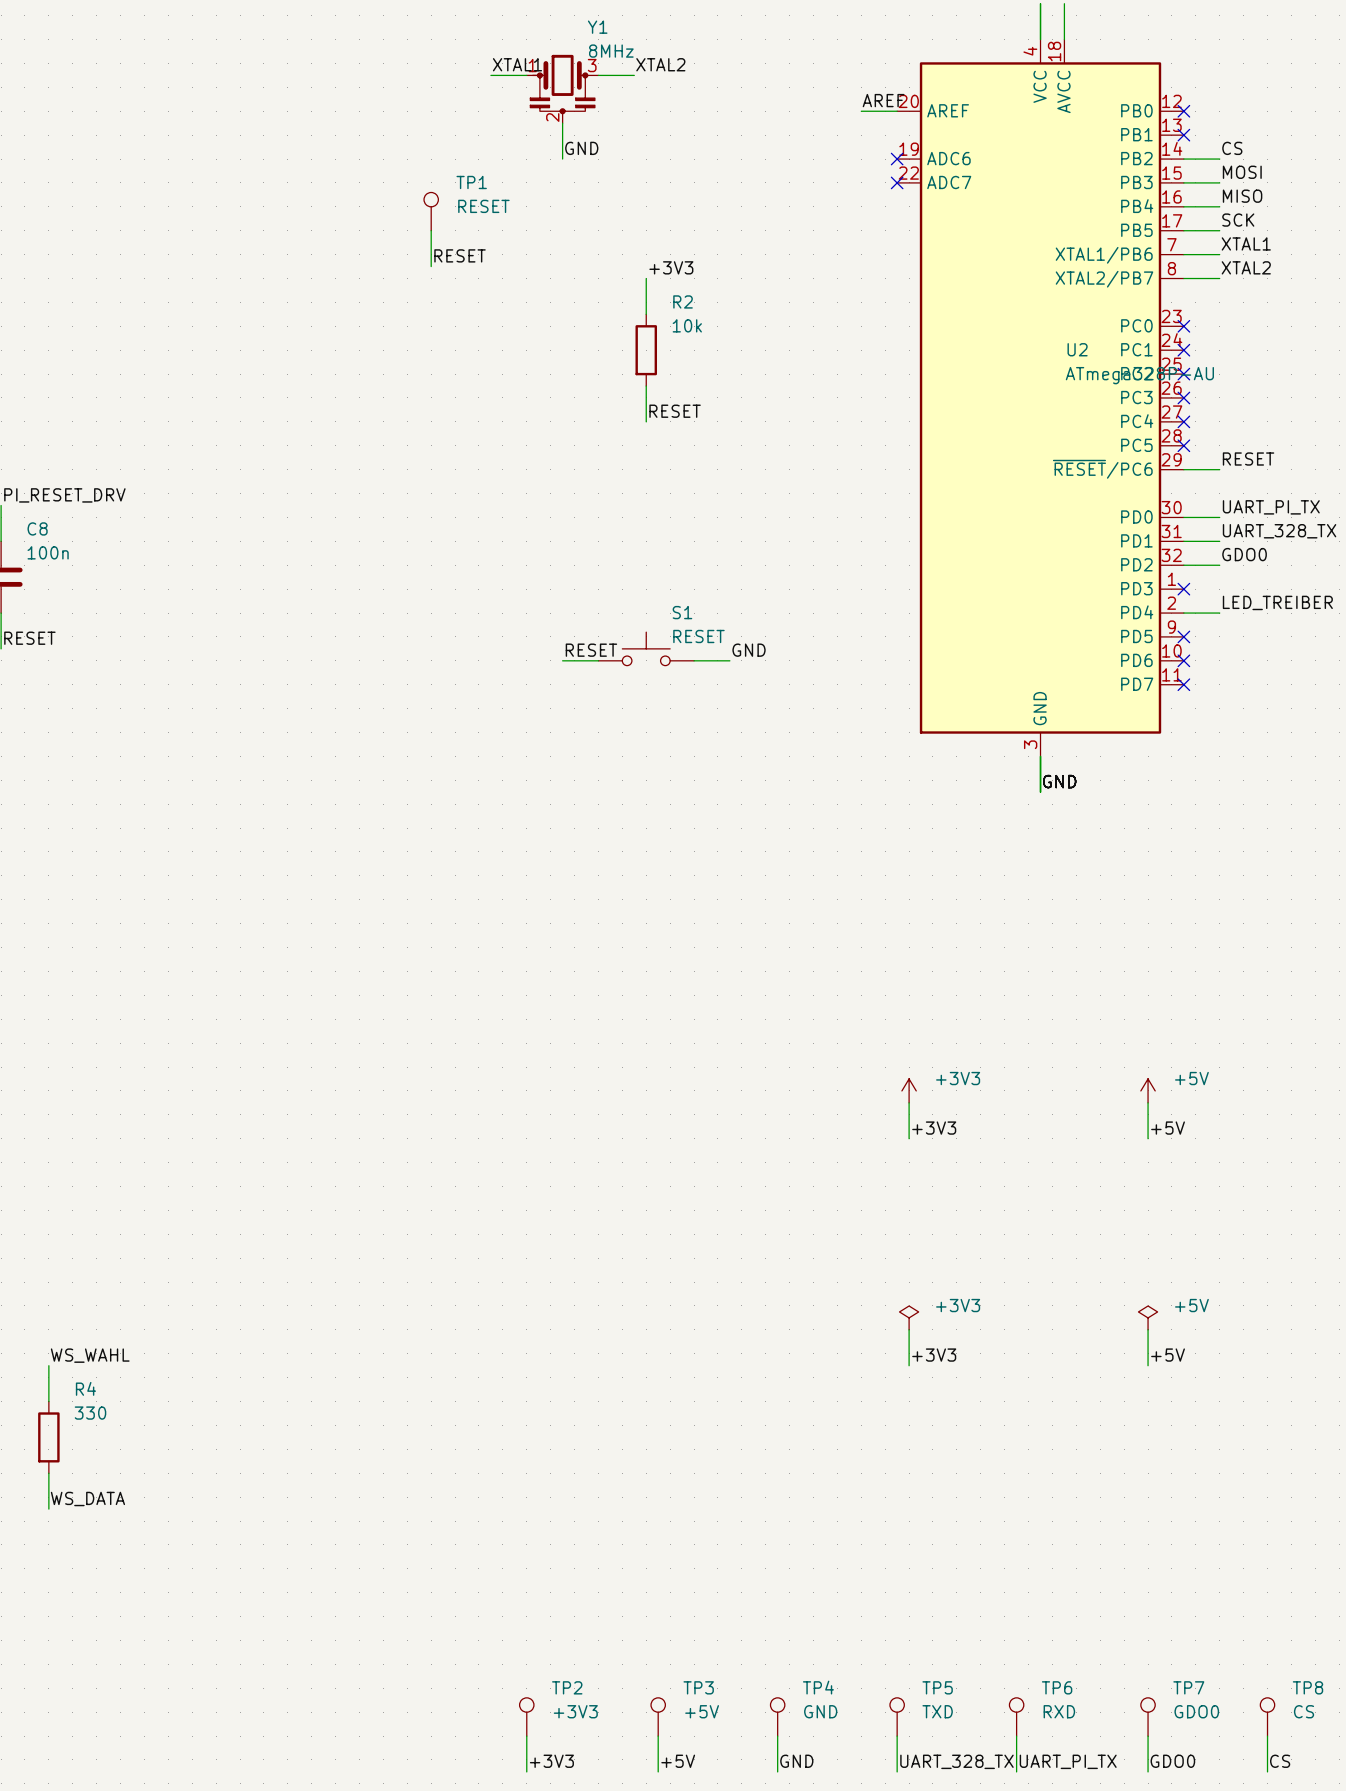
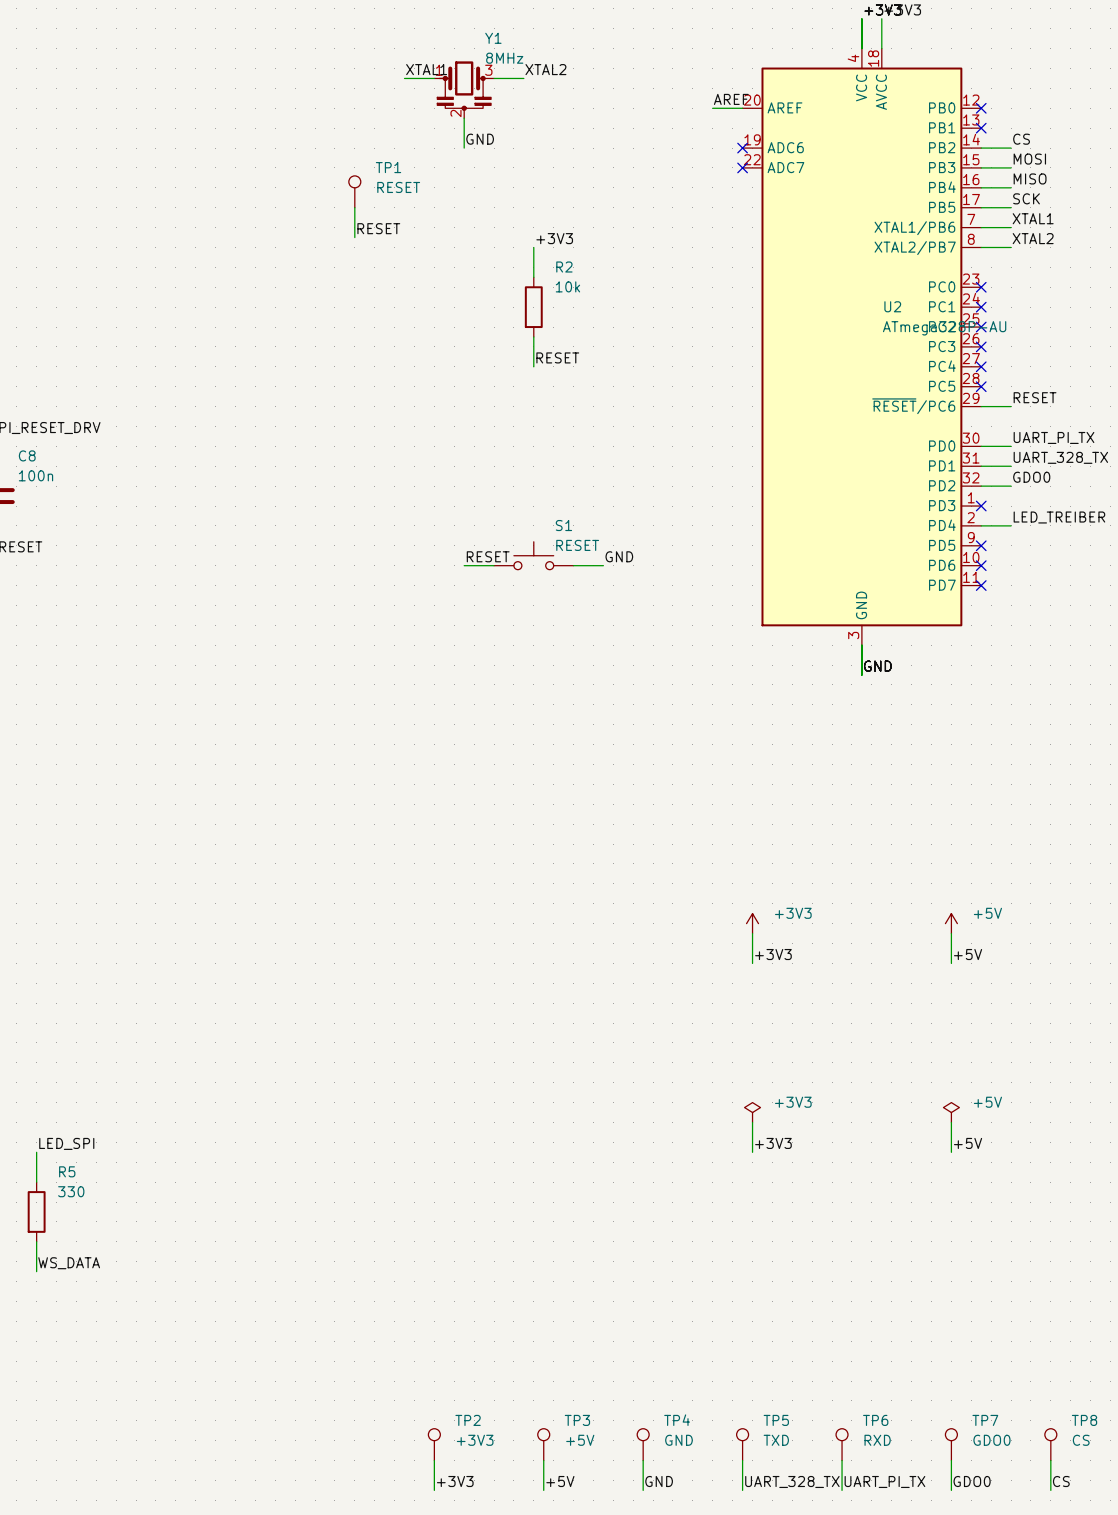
label: WS_WAHL (90, 1355) -> LED_SPI (66, 1143)
R4 name: R4 (85, 1388) -> R5 (67, 1171)

